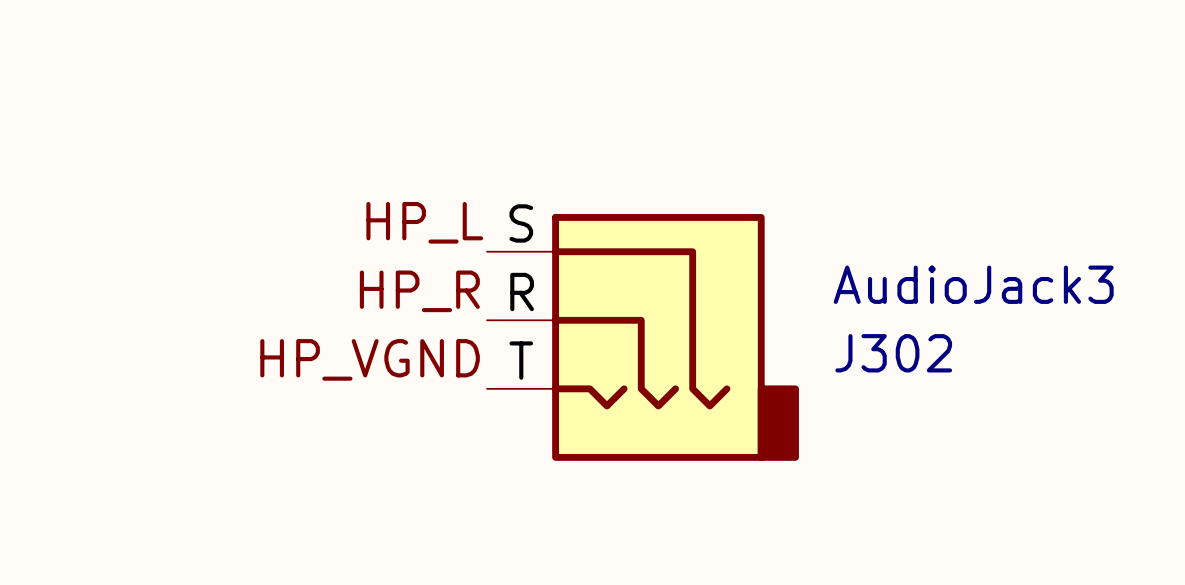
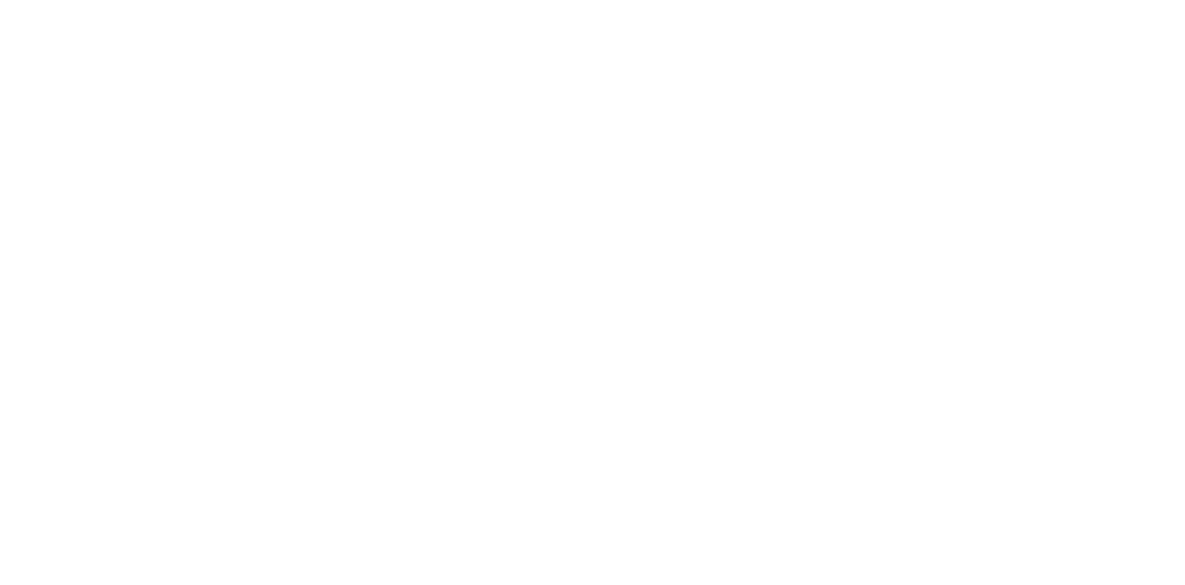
label: HP_L (424, 222) -> none
label: HP_R (419, 291) -> none
J302: AudioJack3 (642, 337) -> none
label: HP_VGND (370, 359) -> none

